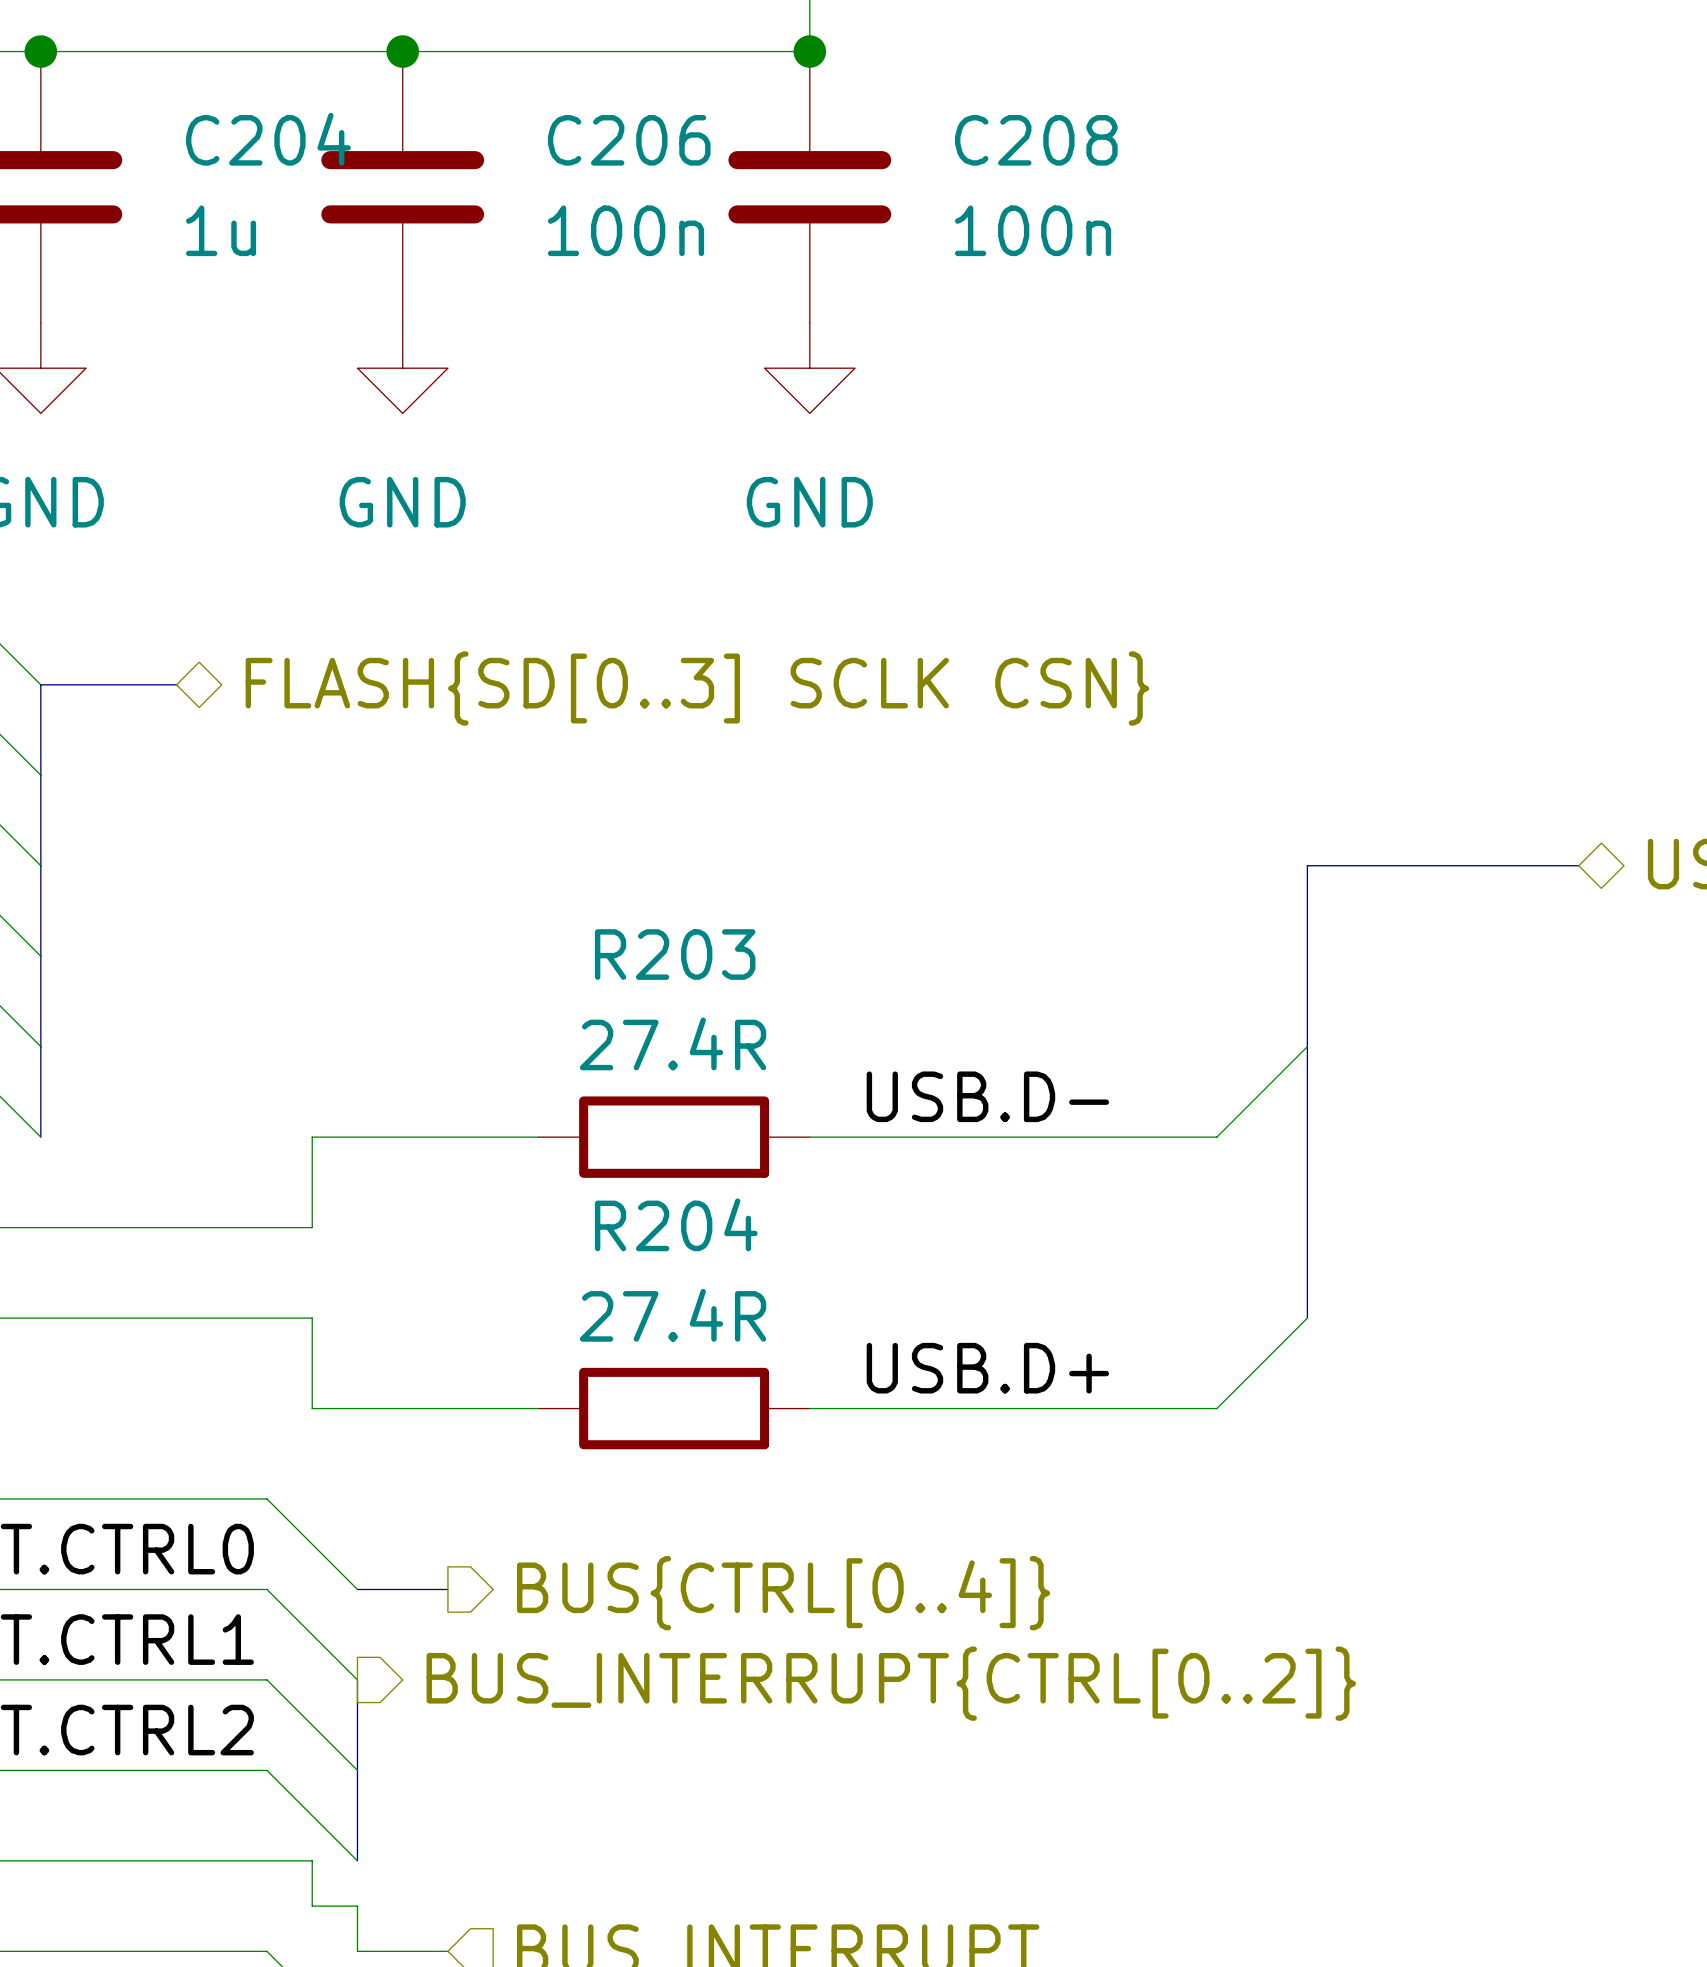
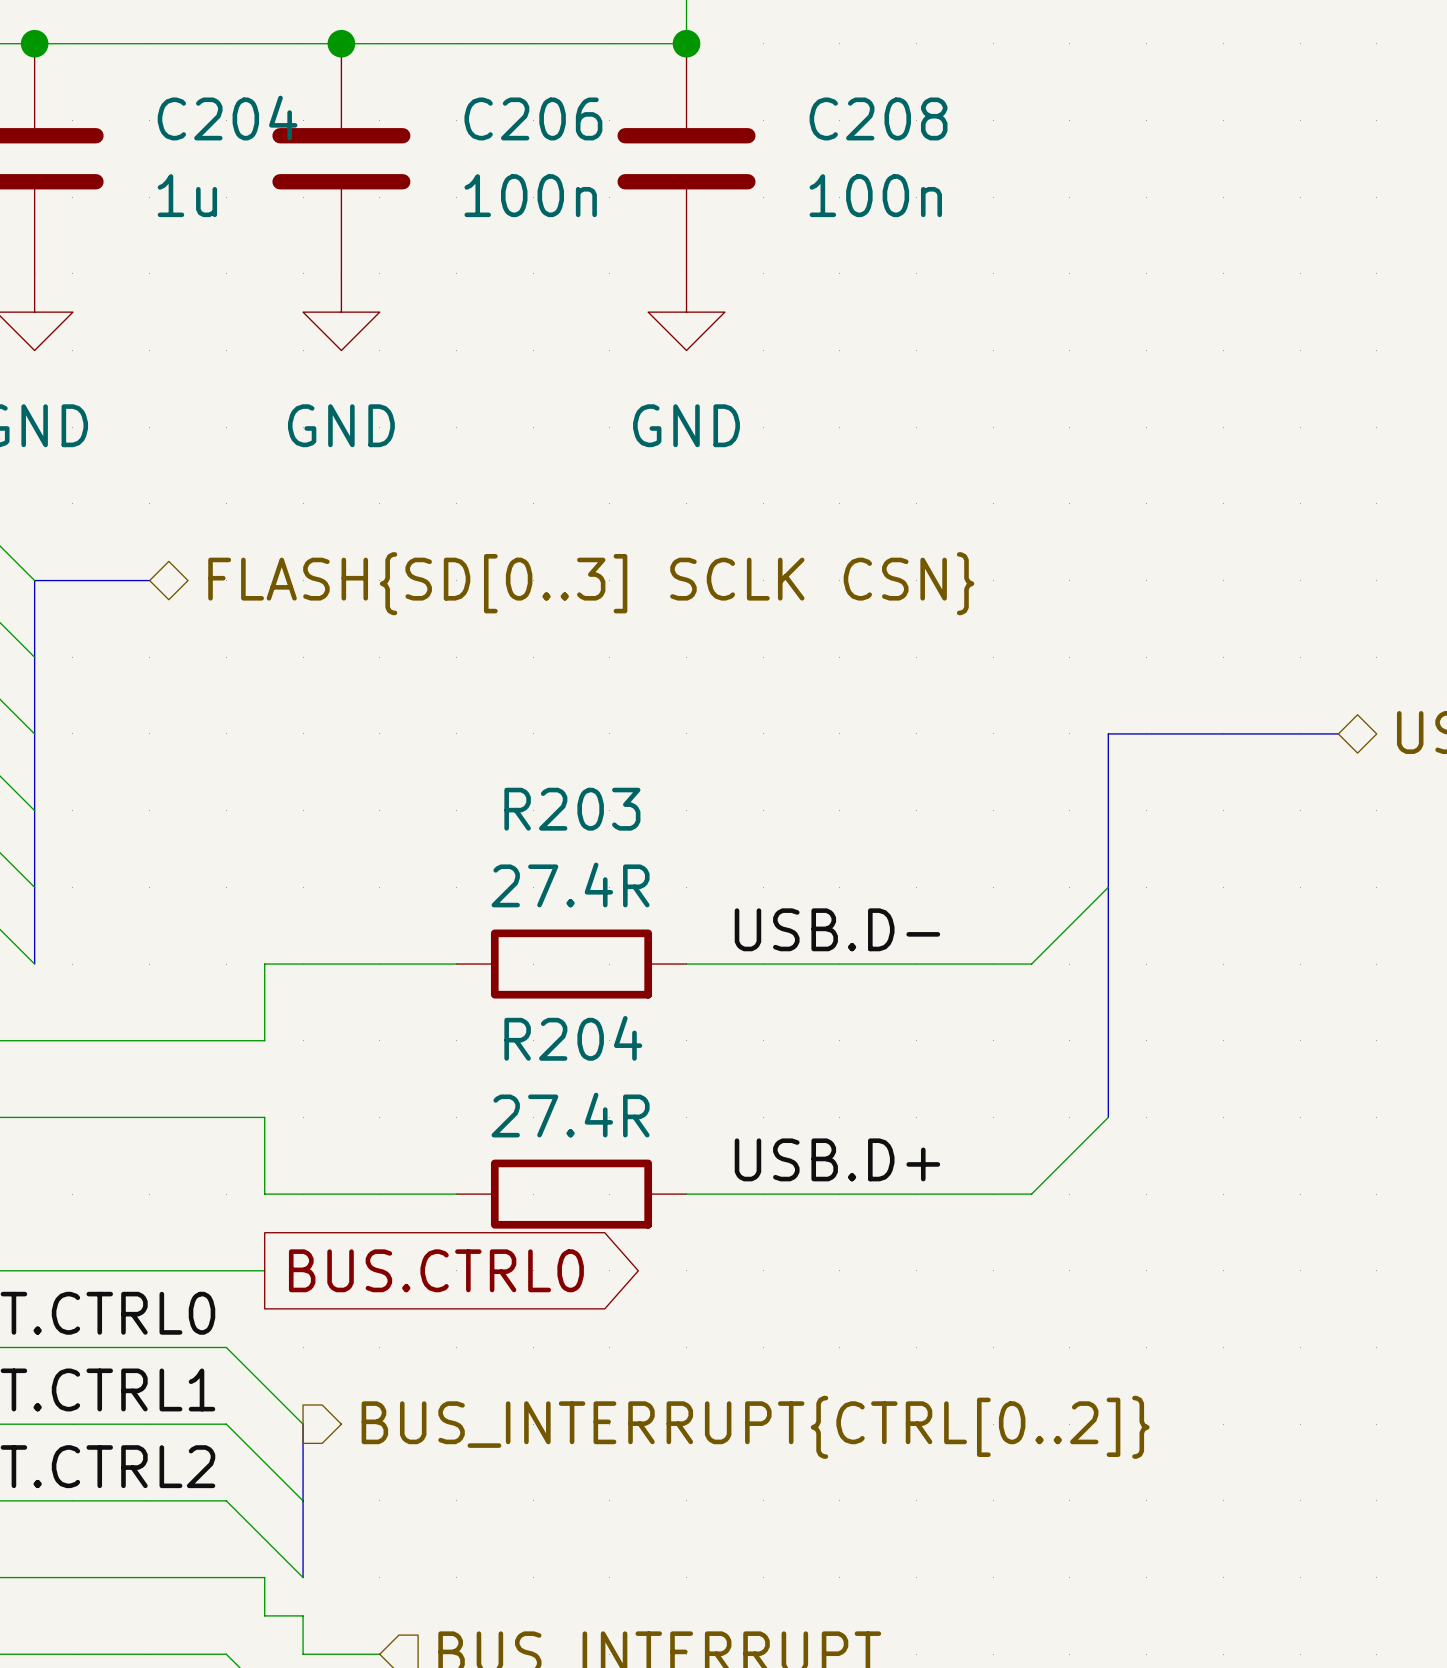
wire: (267, 1499) (357, 1589) -> (226, 1270) (264, 1270)
global label: none -> BUS.CTRL0 (436, 1270)
bus: (357, 1589) (447, 1589) -> none
hierarchical label: BUS{CTRL[0..4]} (783, 1593) -> none

